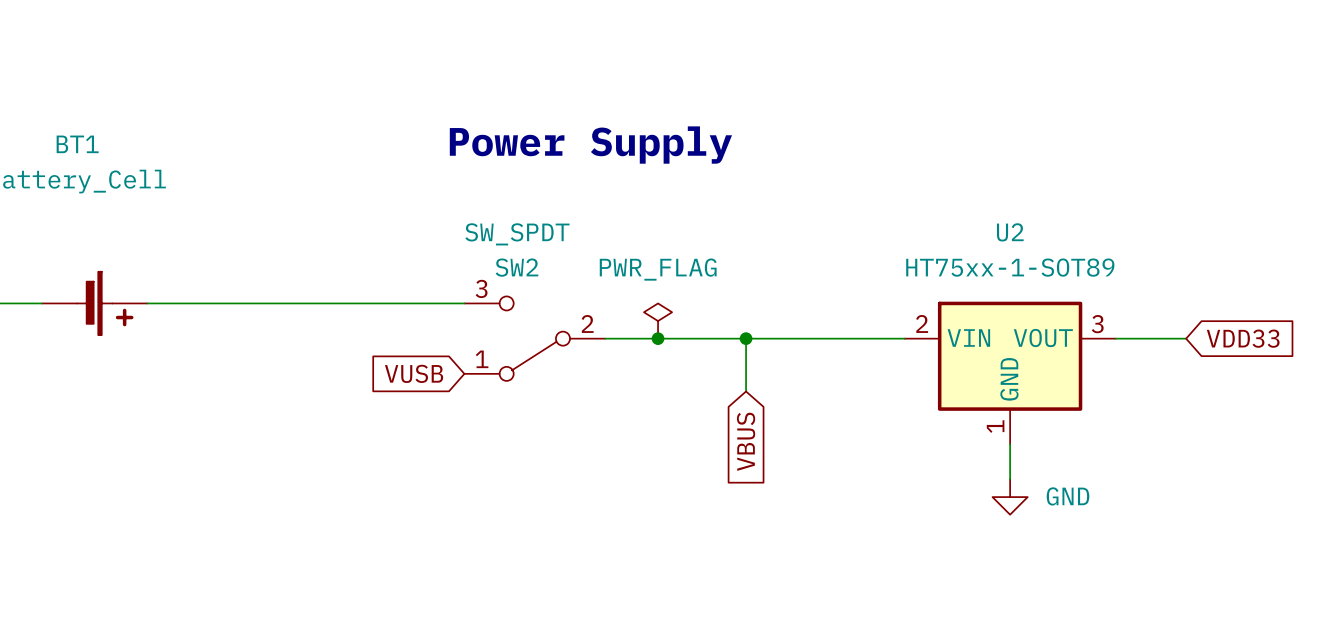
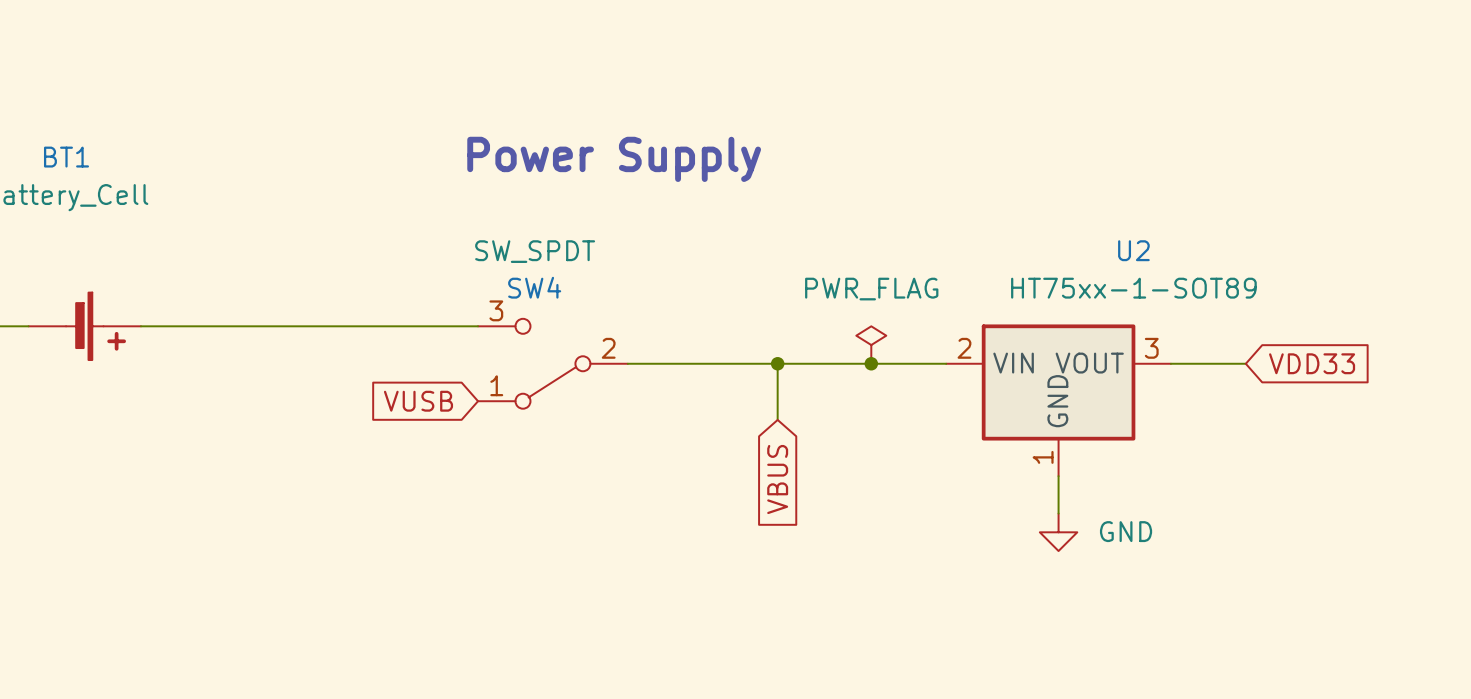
U2 name position: U2 (1010, 232) -> U2 (1133, 250)
SW2 name: SW2 (516, 267) -> SW4 (534, 287)
U2 value position: HT75xx-1-SOT89 (1010, 267) -> HT75xx-1-SOT89 (1133, 288)
power symbol position: PWR_FLAG (658, 321) -> PWR_FLAG (871, 345)
junction: (658, 338) -> none
junction: none -> (871, 363)

